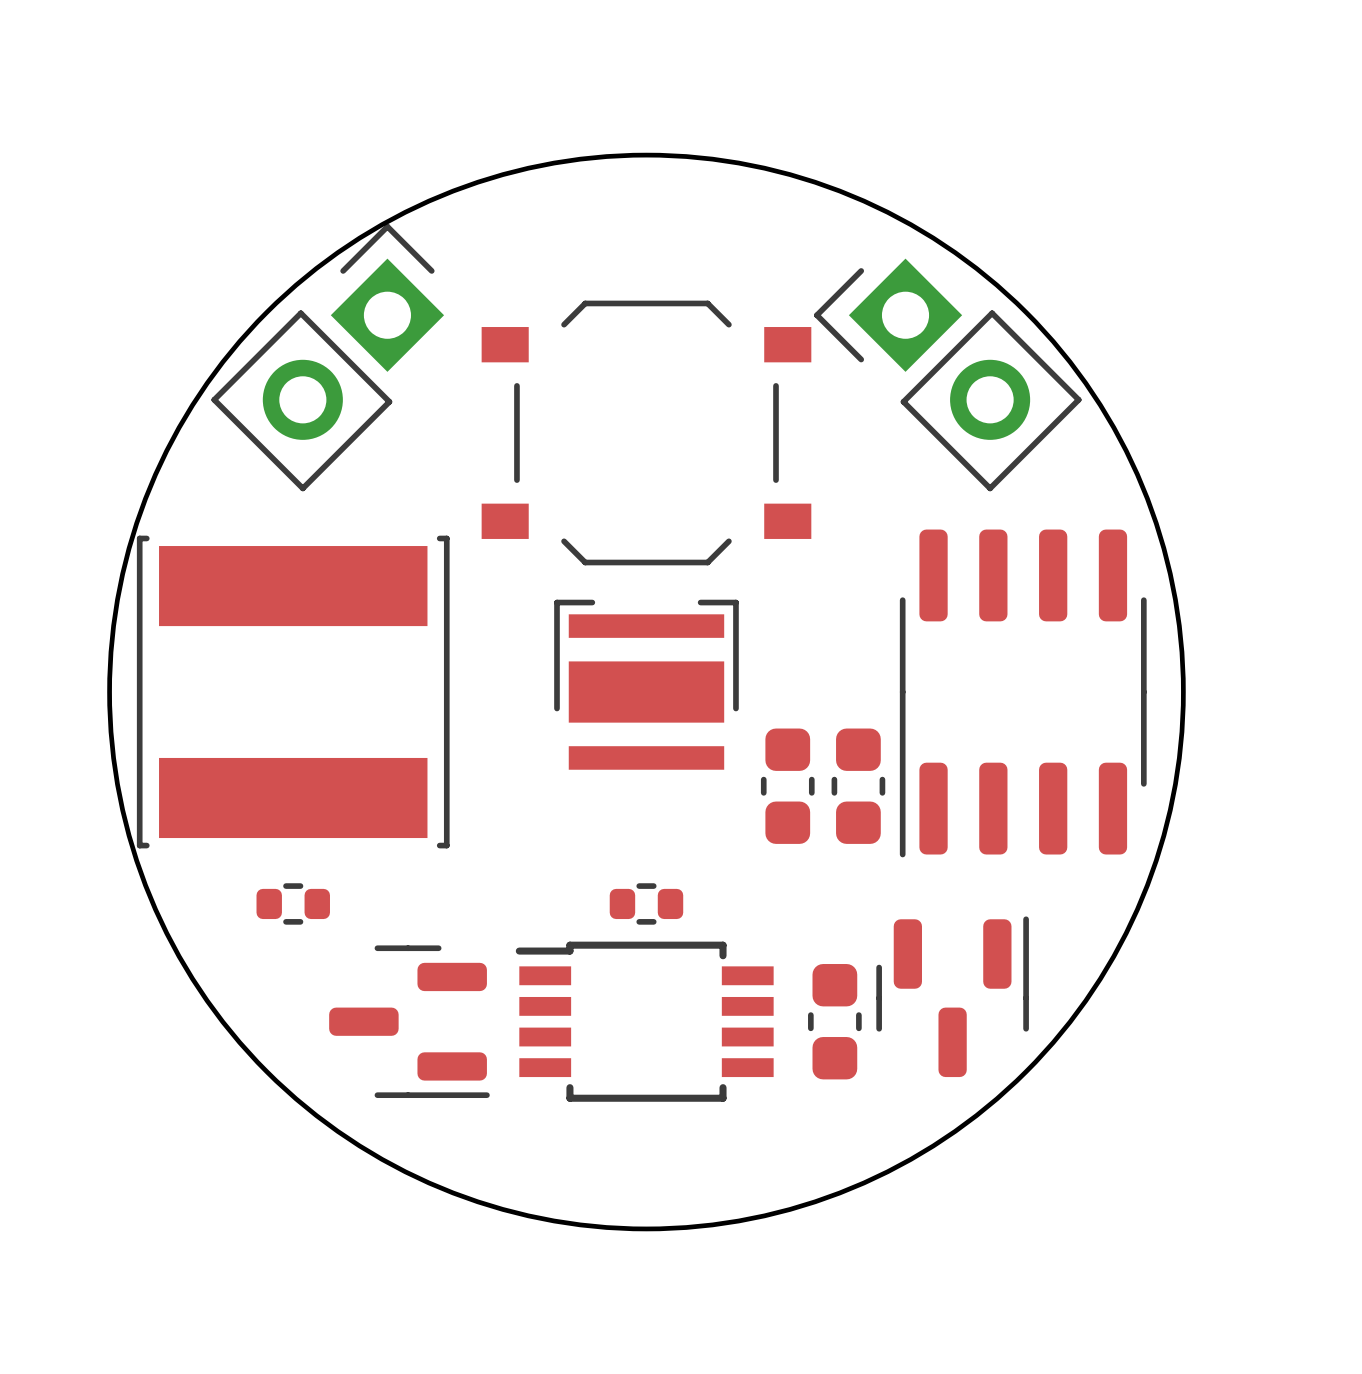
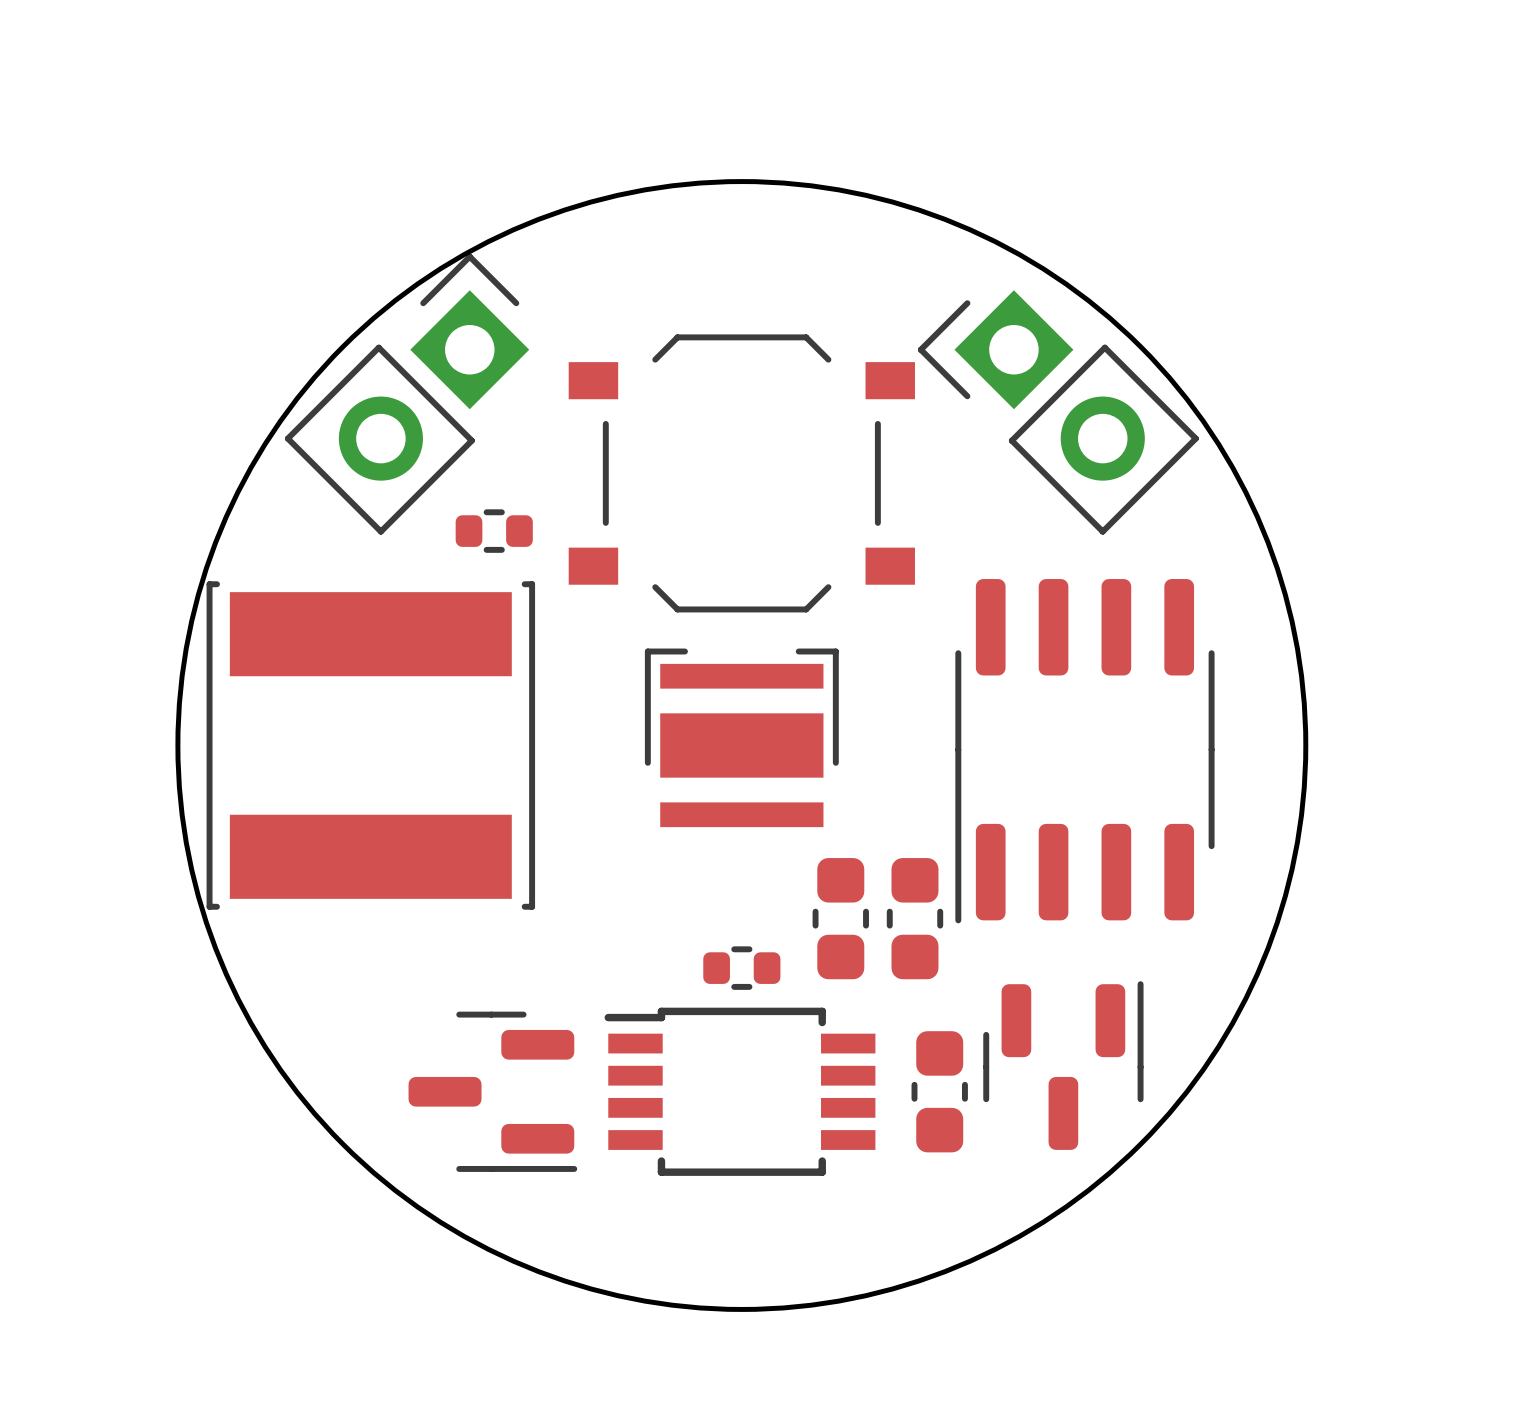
part position: (1023, 693) -> (1084, 751)
part: (787, 786) -> none
part: (858, 786) -> none
part: none -> (840, 918)
part: none -> (914, 918)
part position: (293, 903) -> (494, 531)

